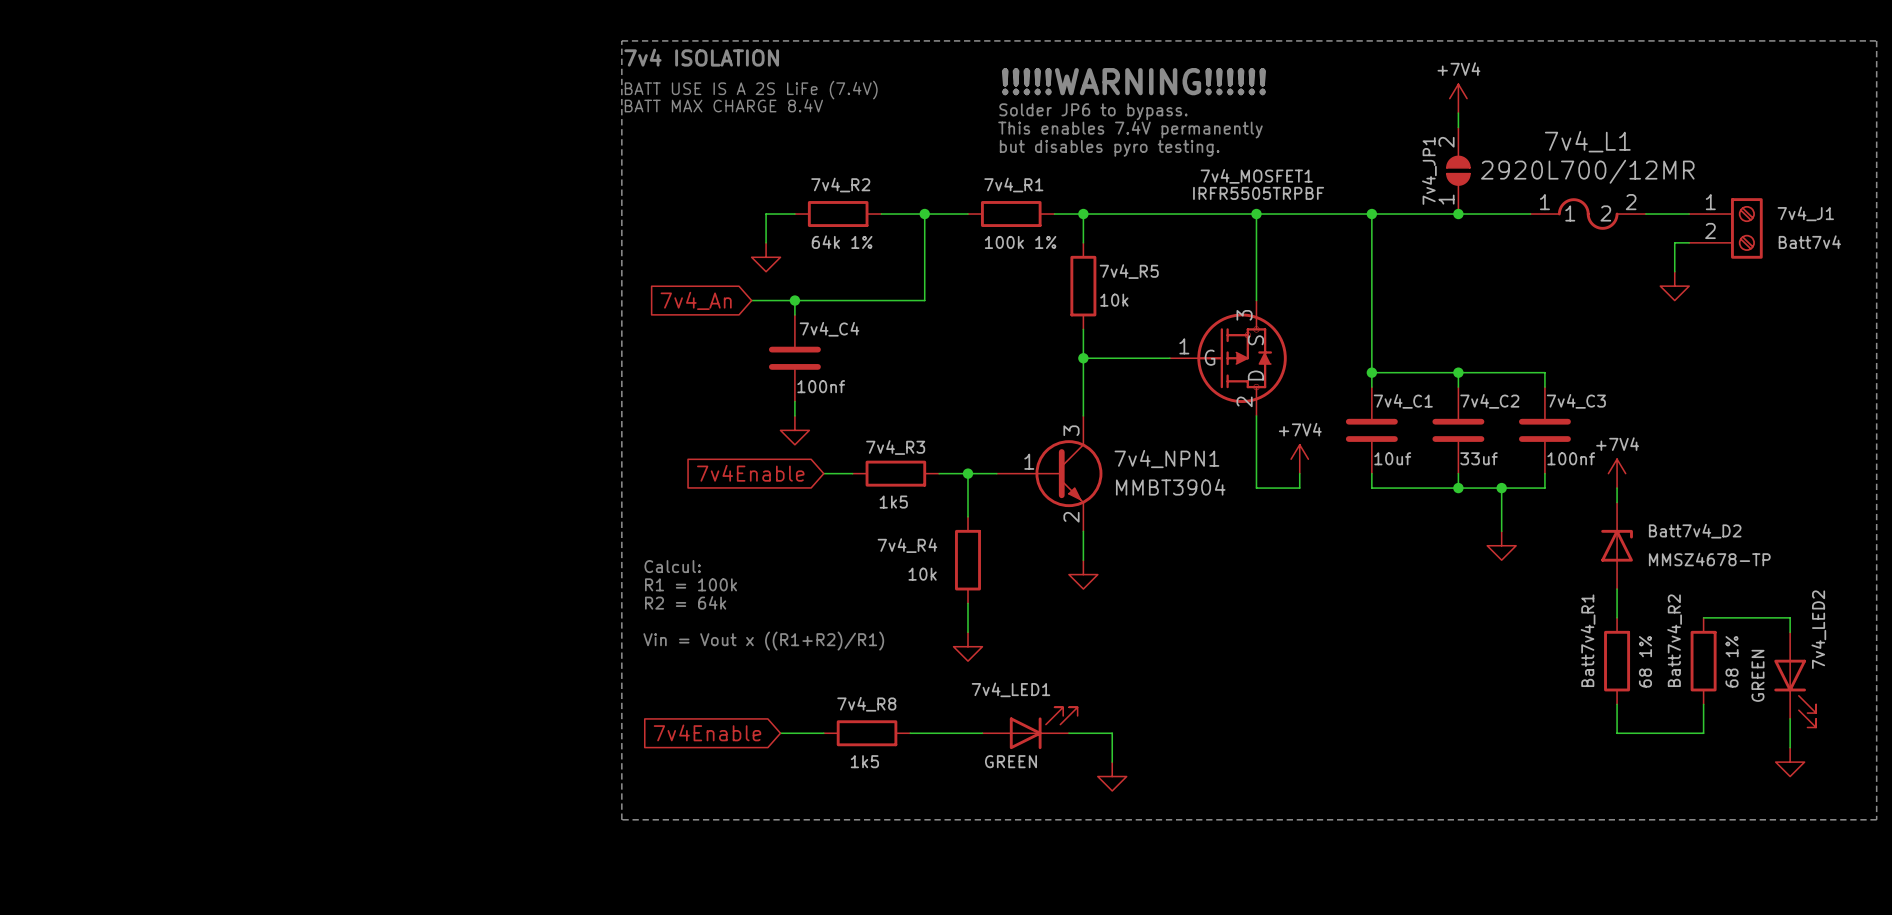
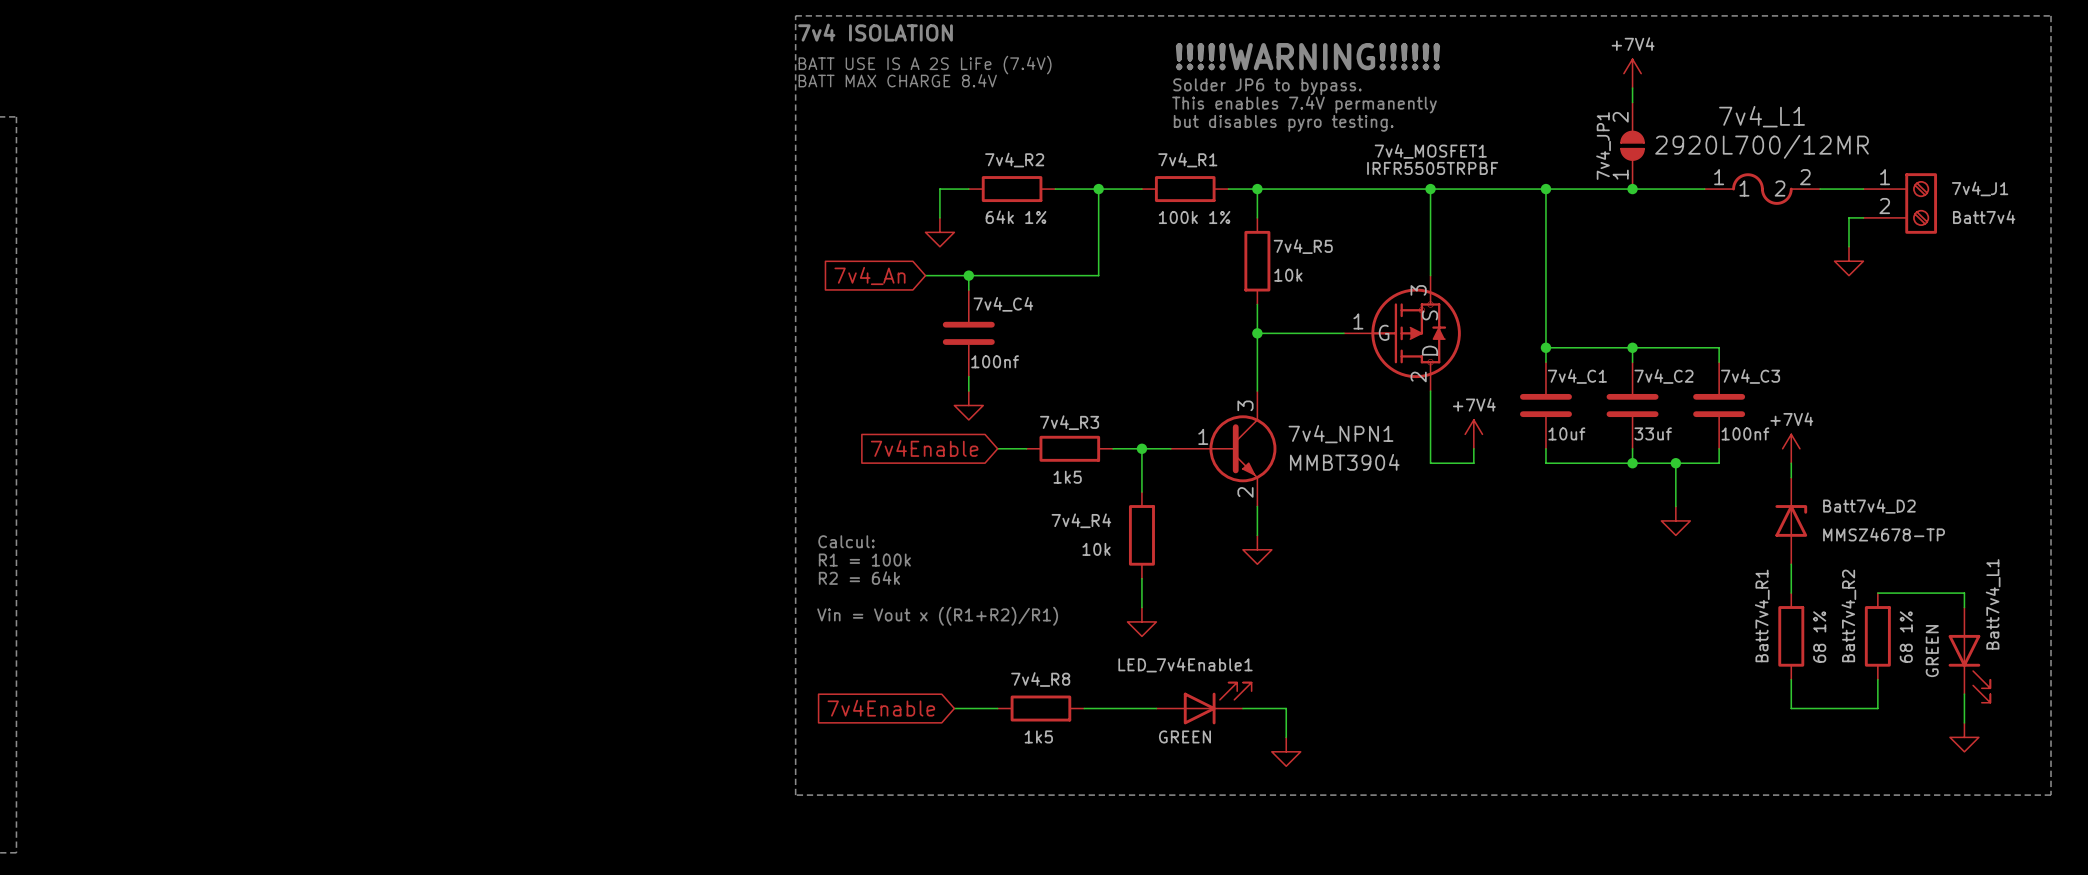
7v4_LED2 name: 7v4_LED2 (1818, 629) -> Batt7v4_L1 (1993, 604)
7v4_LED1 name: 7v4_LED1 (1011, 689) -> LED_7v4Enable1 (1185, 665)

